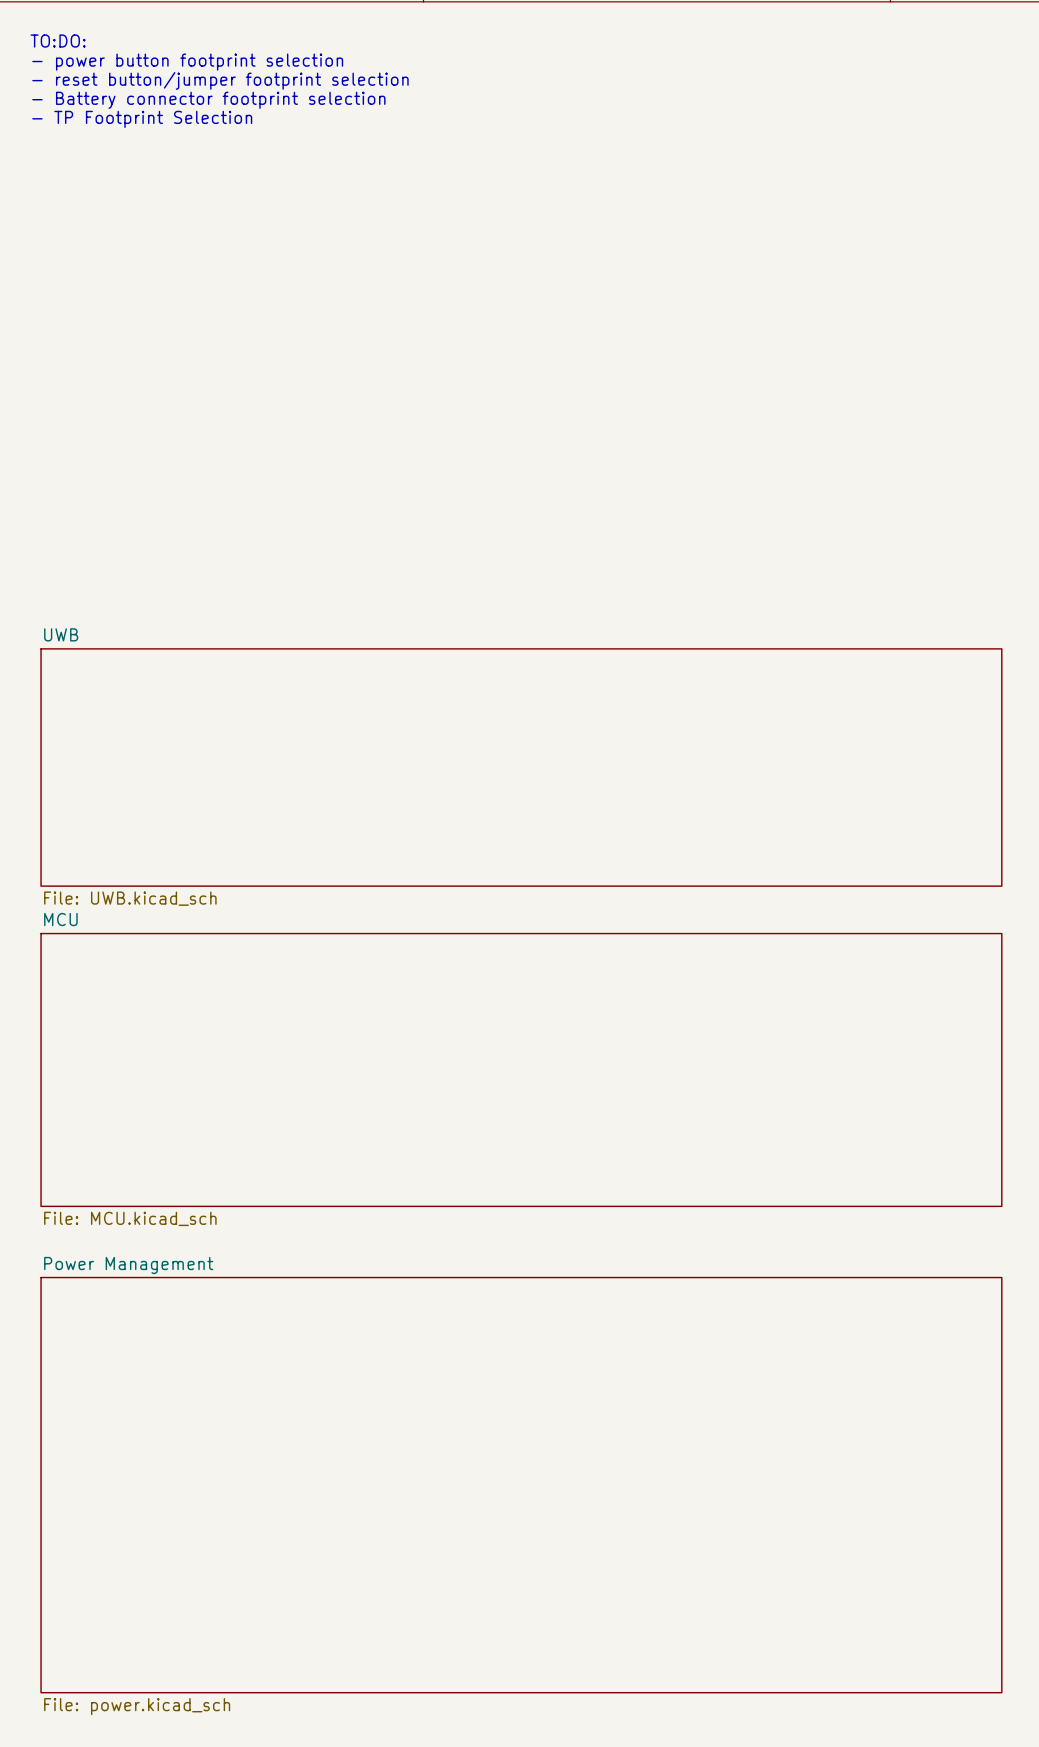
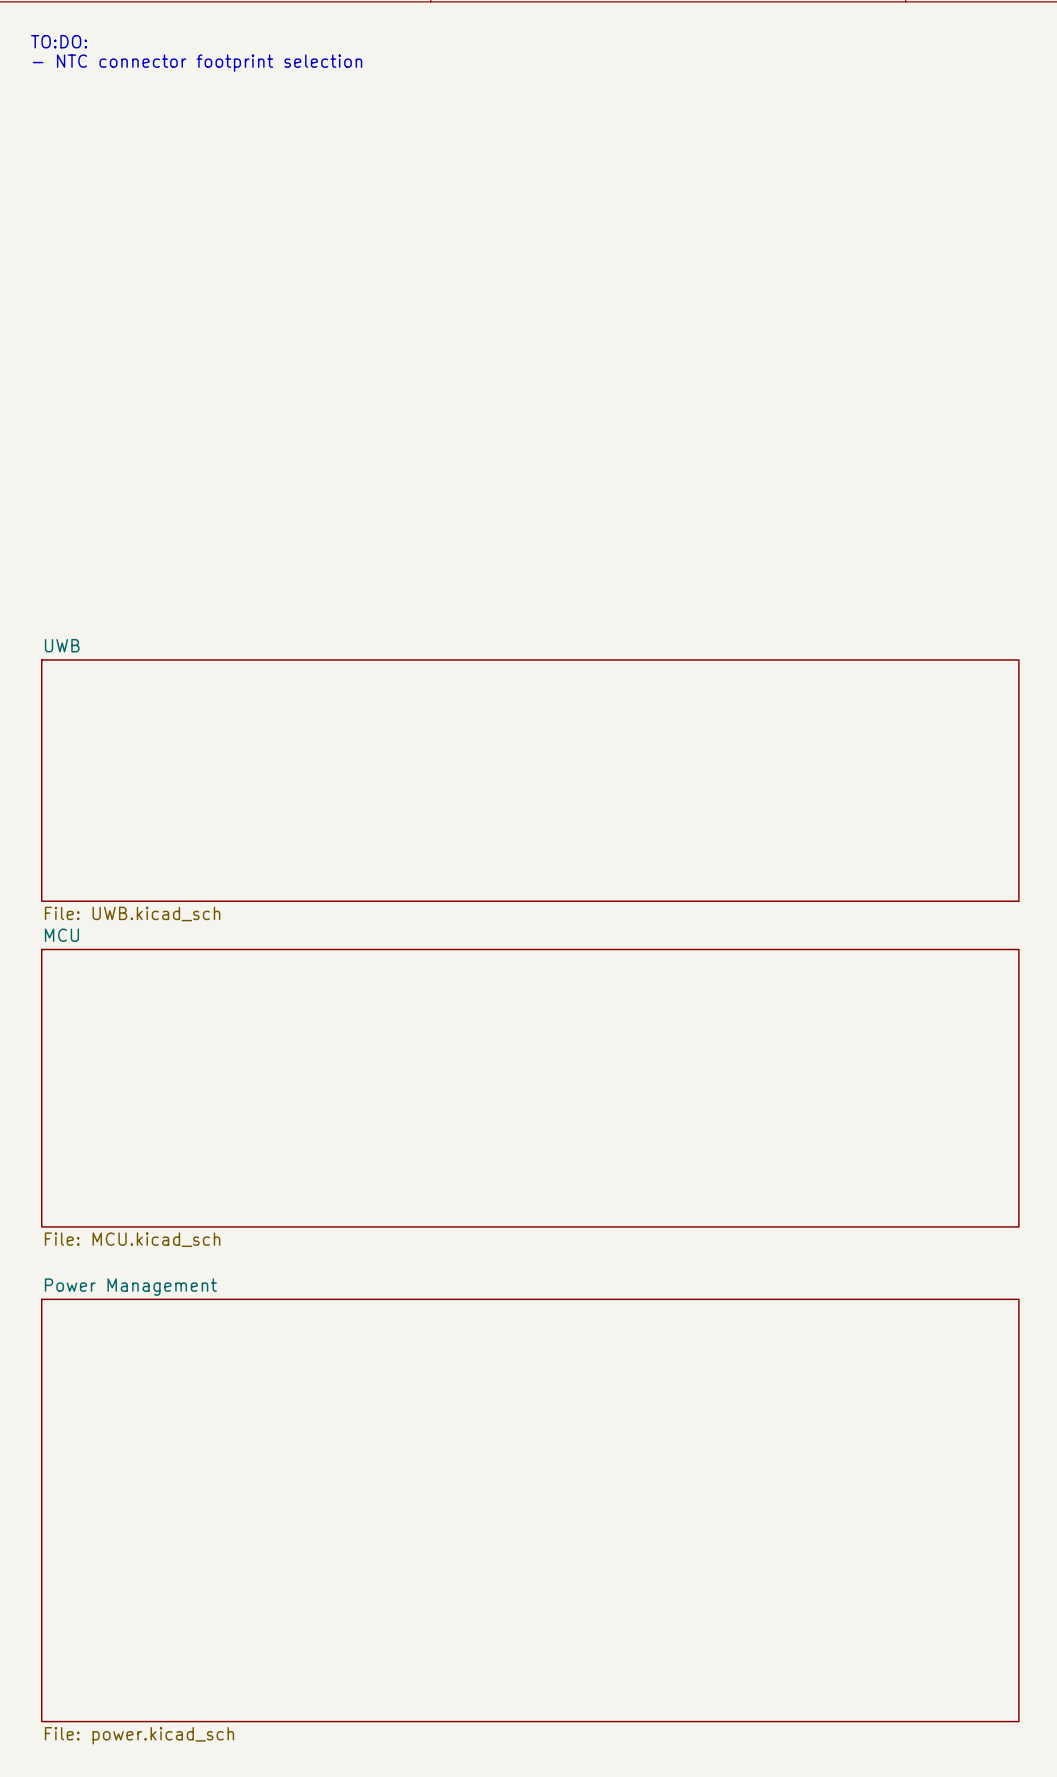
text: - power button footprint selection (187, 62) -> - NTC connector footprint selection (197, 63)
text: - reset button/jumper footprint selection (220, 80) -> none
text: - Battery connector footprint selection (208, 100) -> none
text: - TP Footprint Selection (142, 119) -> none

